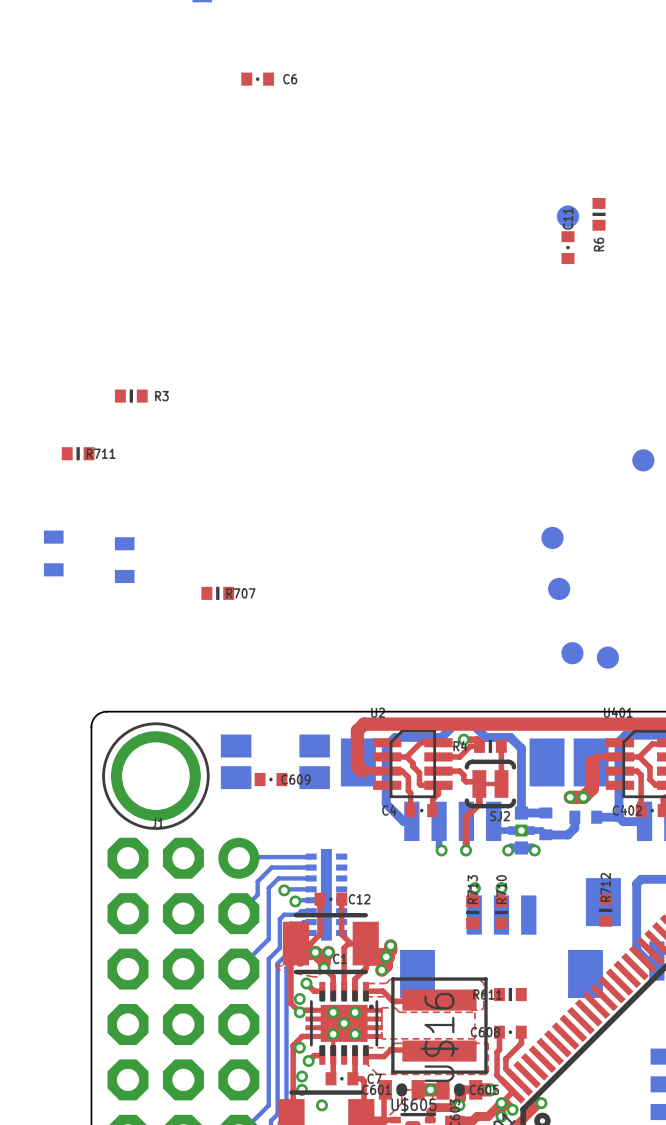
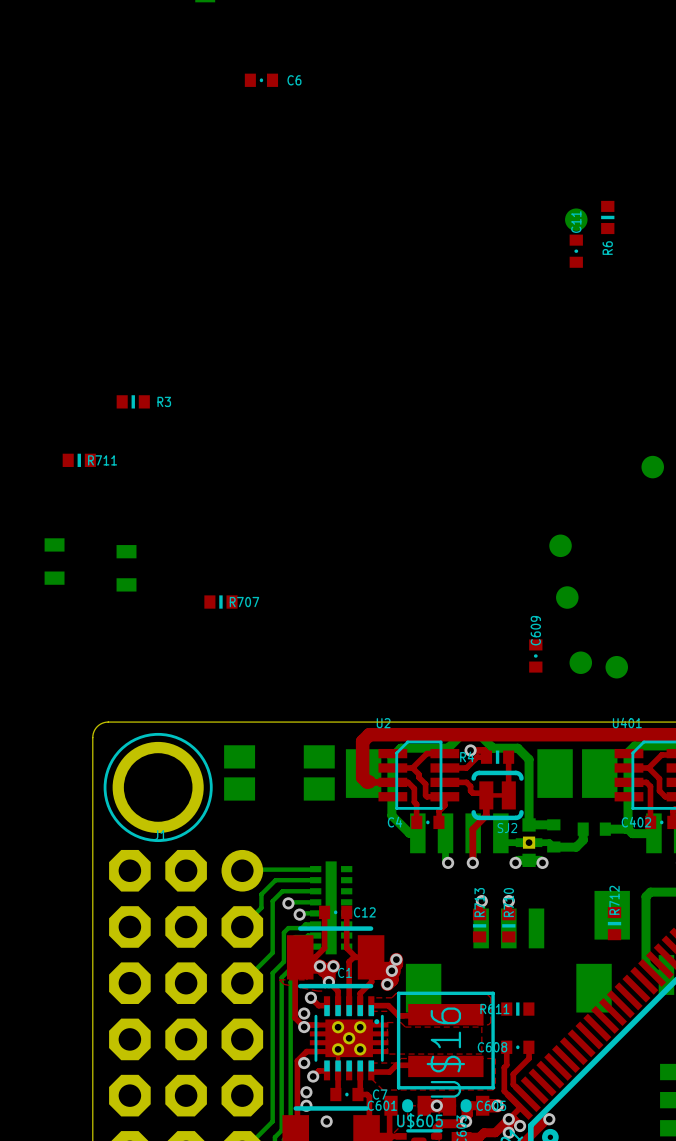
top track: (619, 756) (597, 756) (592, 761) (592, 788) (583, 797) (570, 797) -> none
C609 rotation: 0° (270, 779) -> 90° clockwise (535, 655)
C609 position: (270, 779) -> (535, 655)
via: (570, 797) -> none
via: (583, 797) -> none

